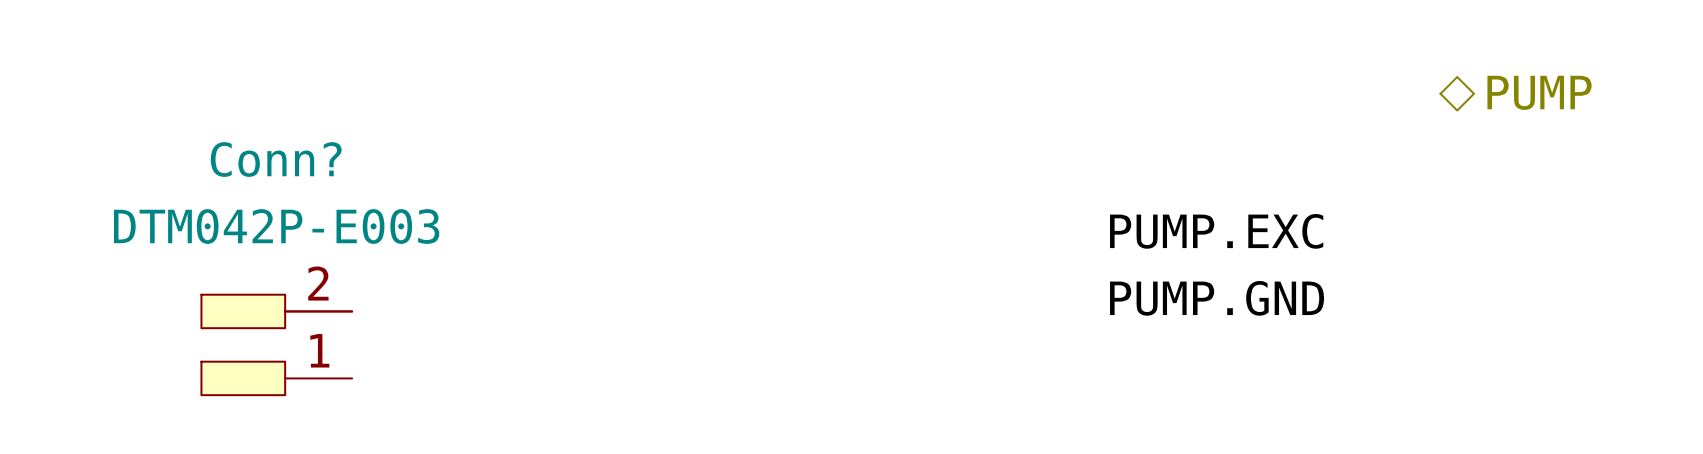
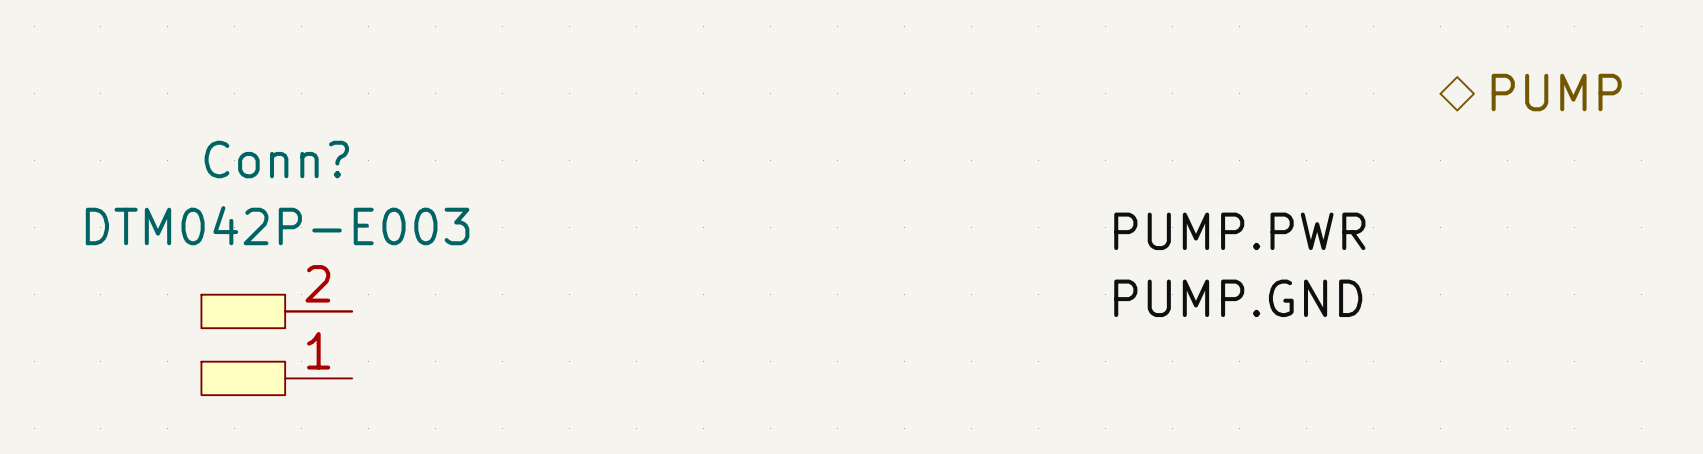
label: PUMP.EXC (1216, 231) -> PUMP.PWR (1239, 231)

